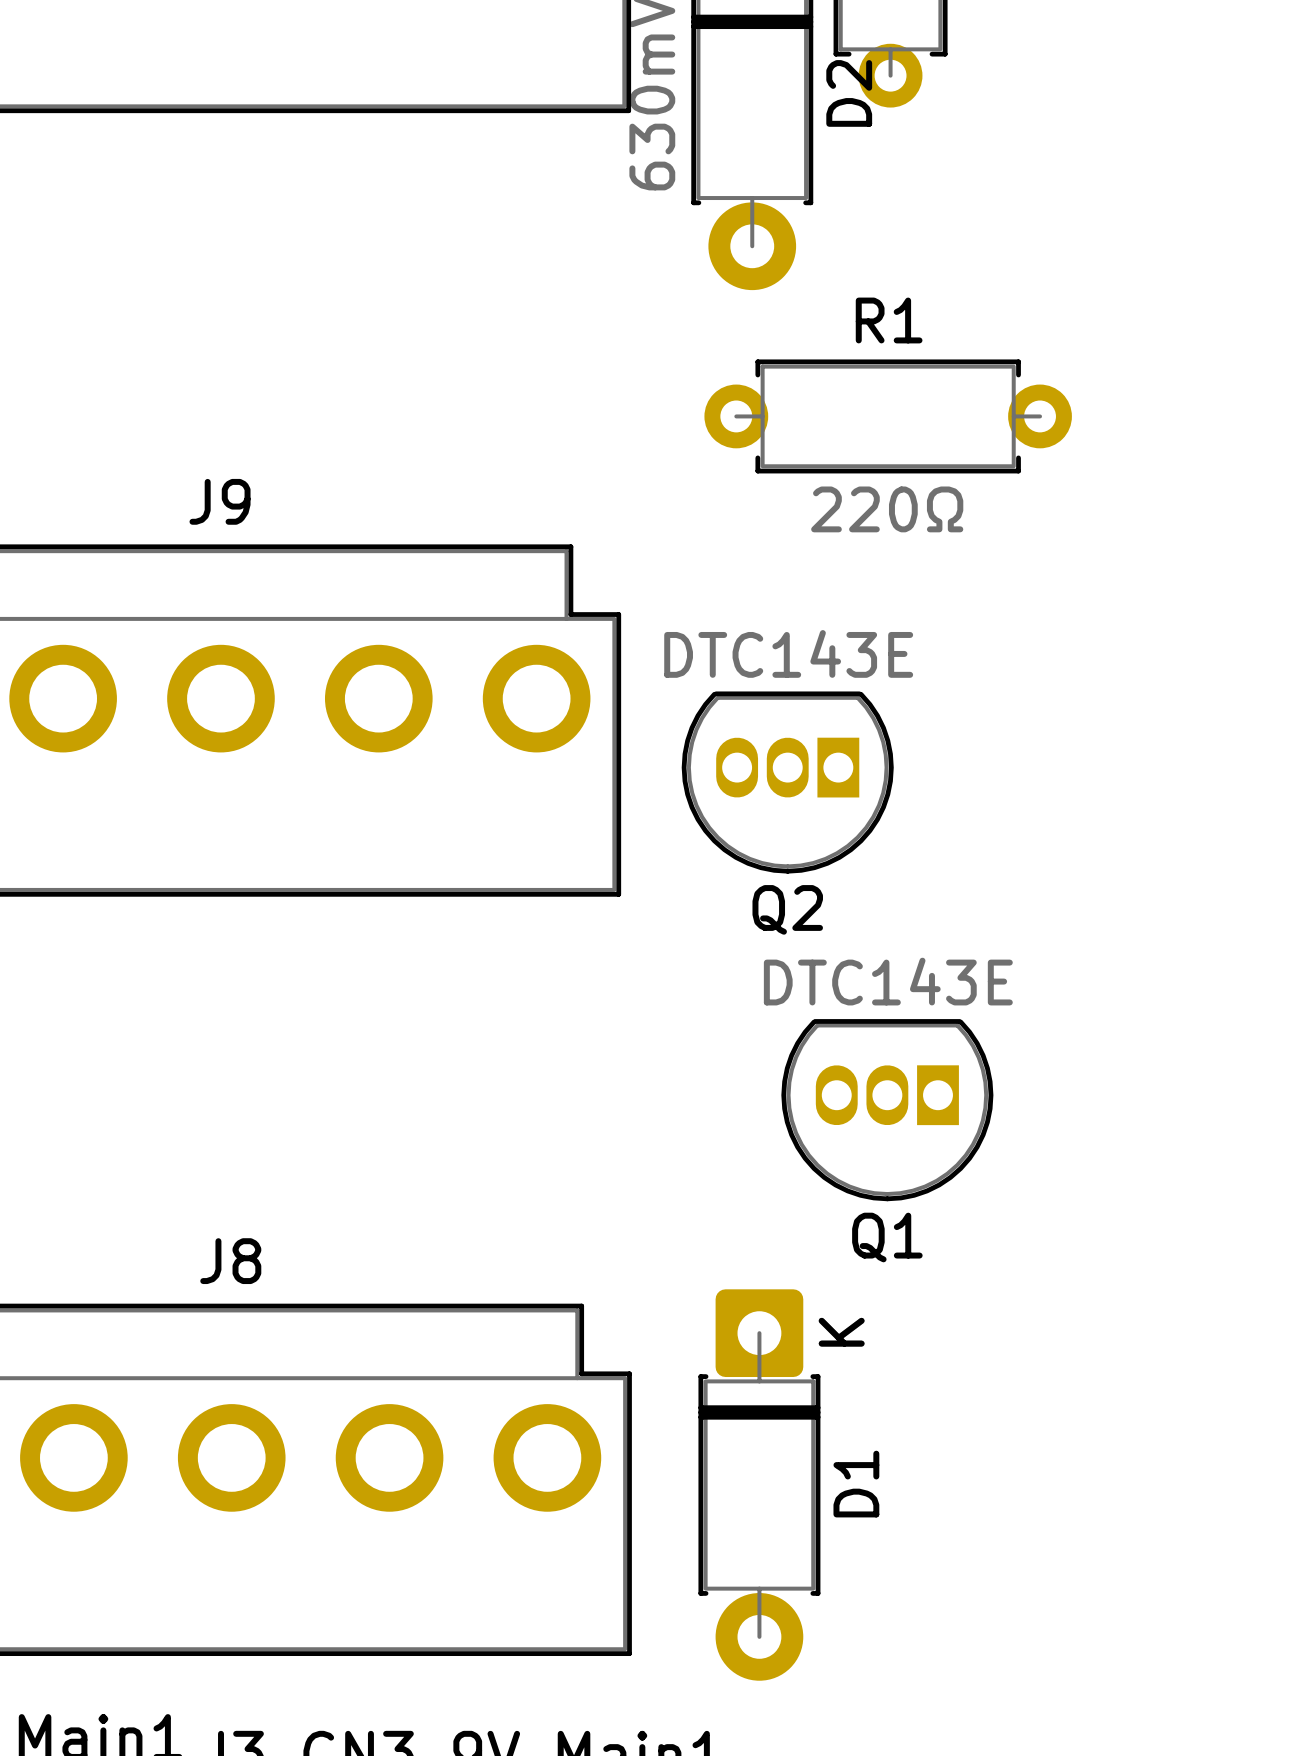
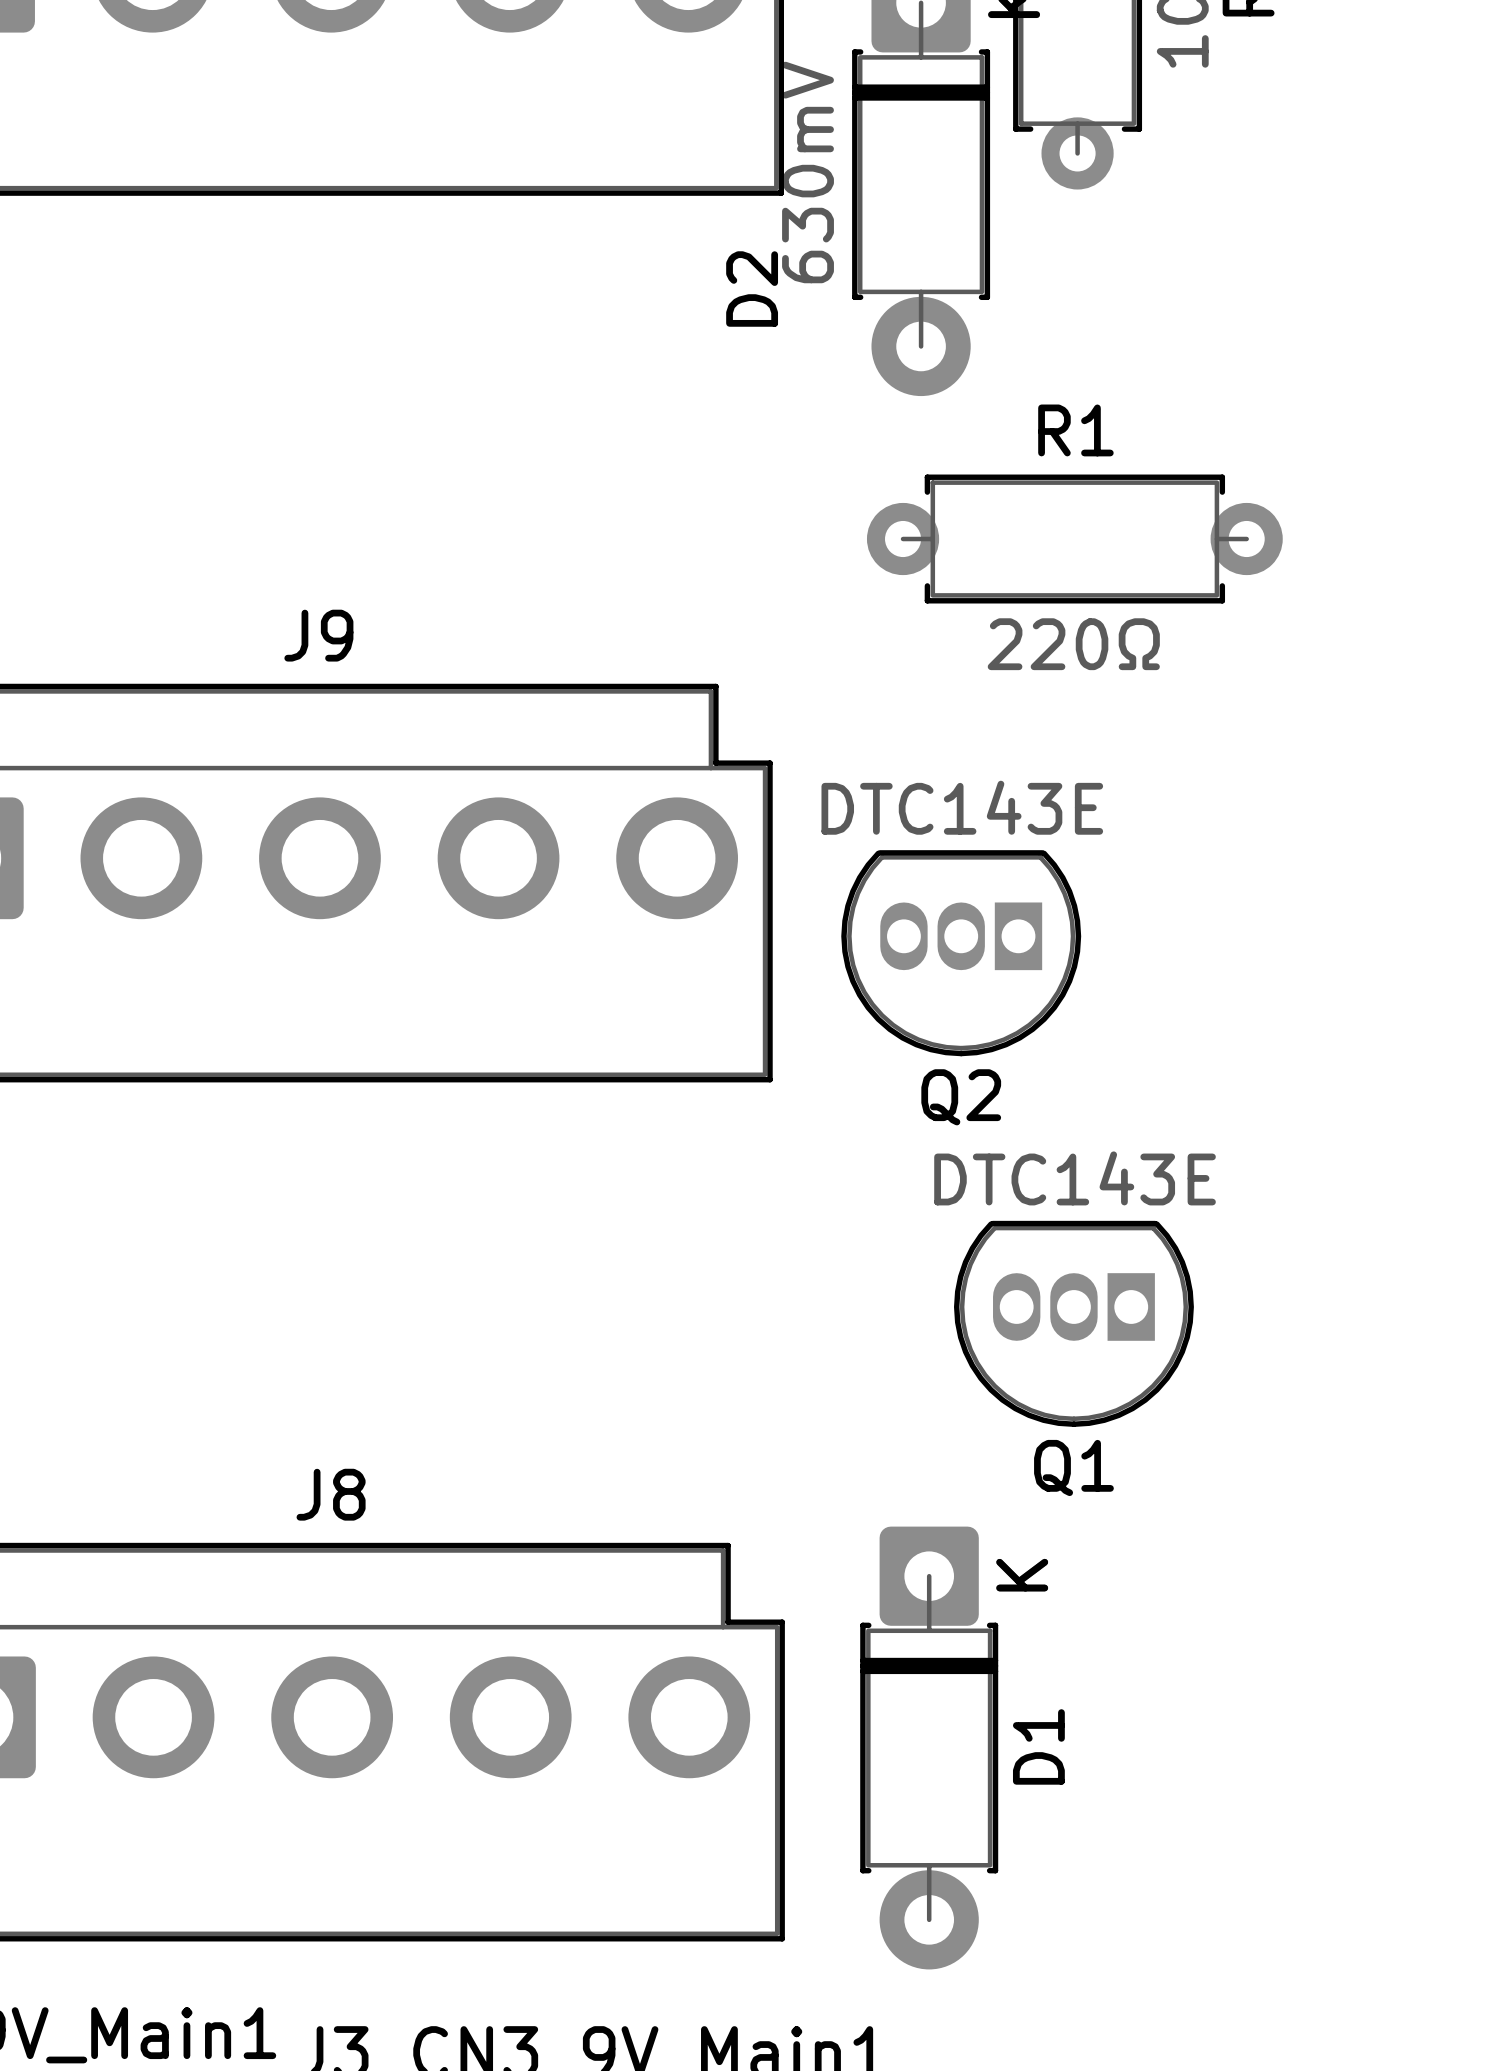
D2 name position: D2 (849, 93) -> D2 (752, 289)

